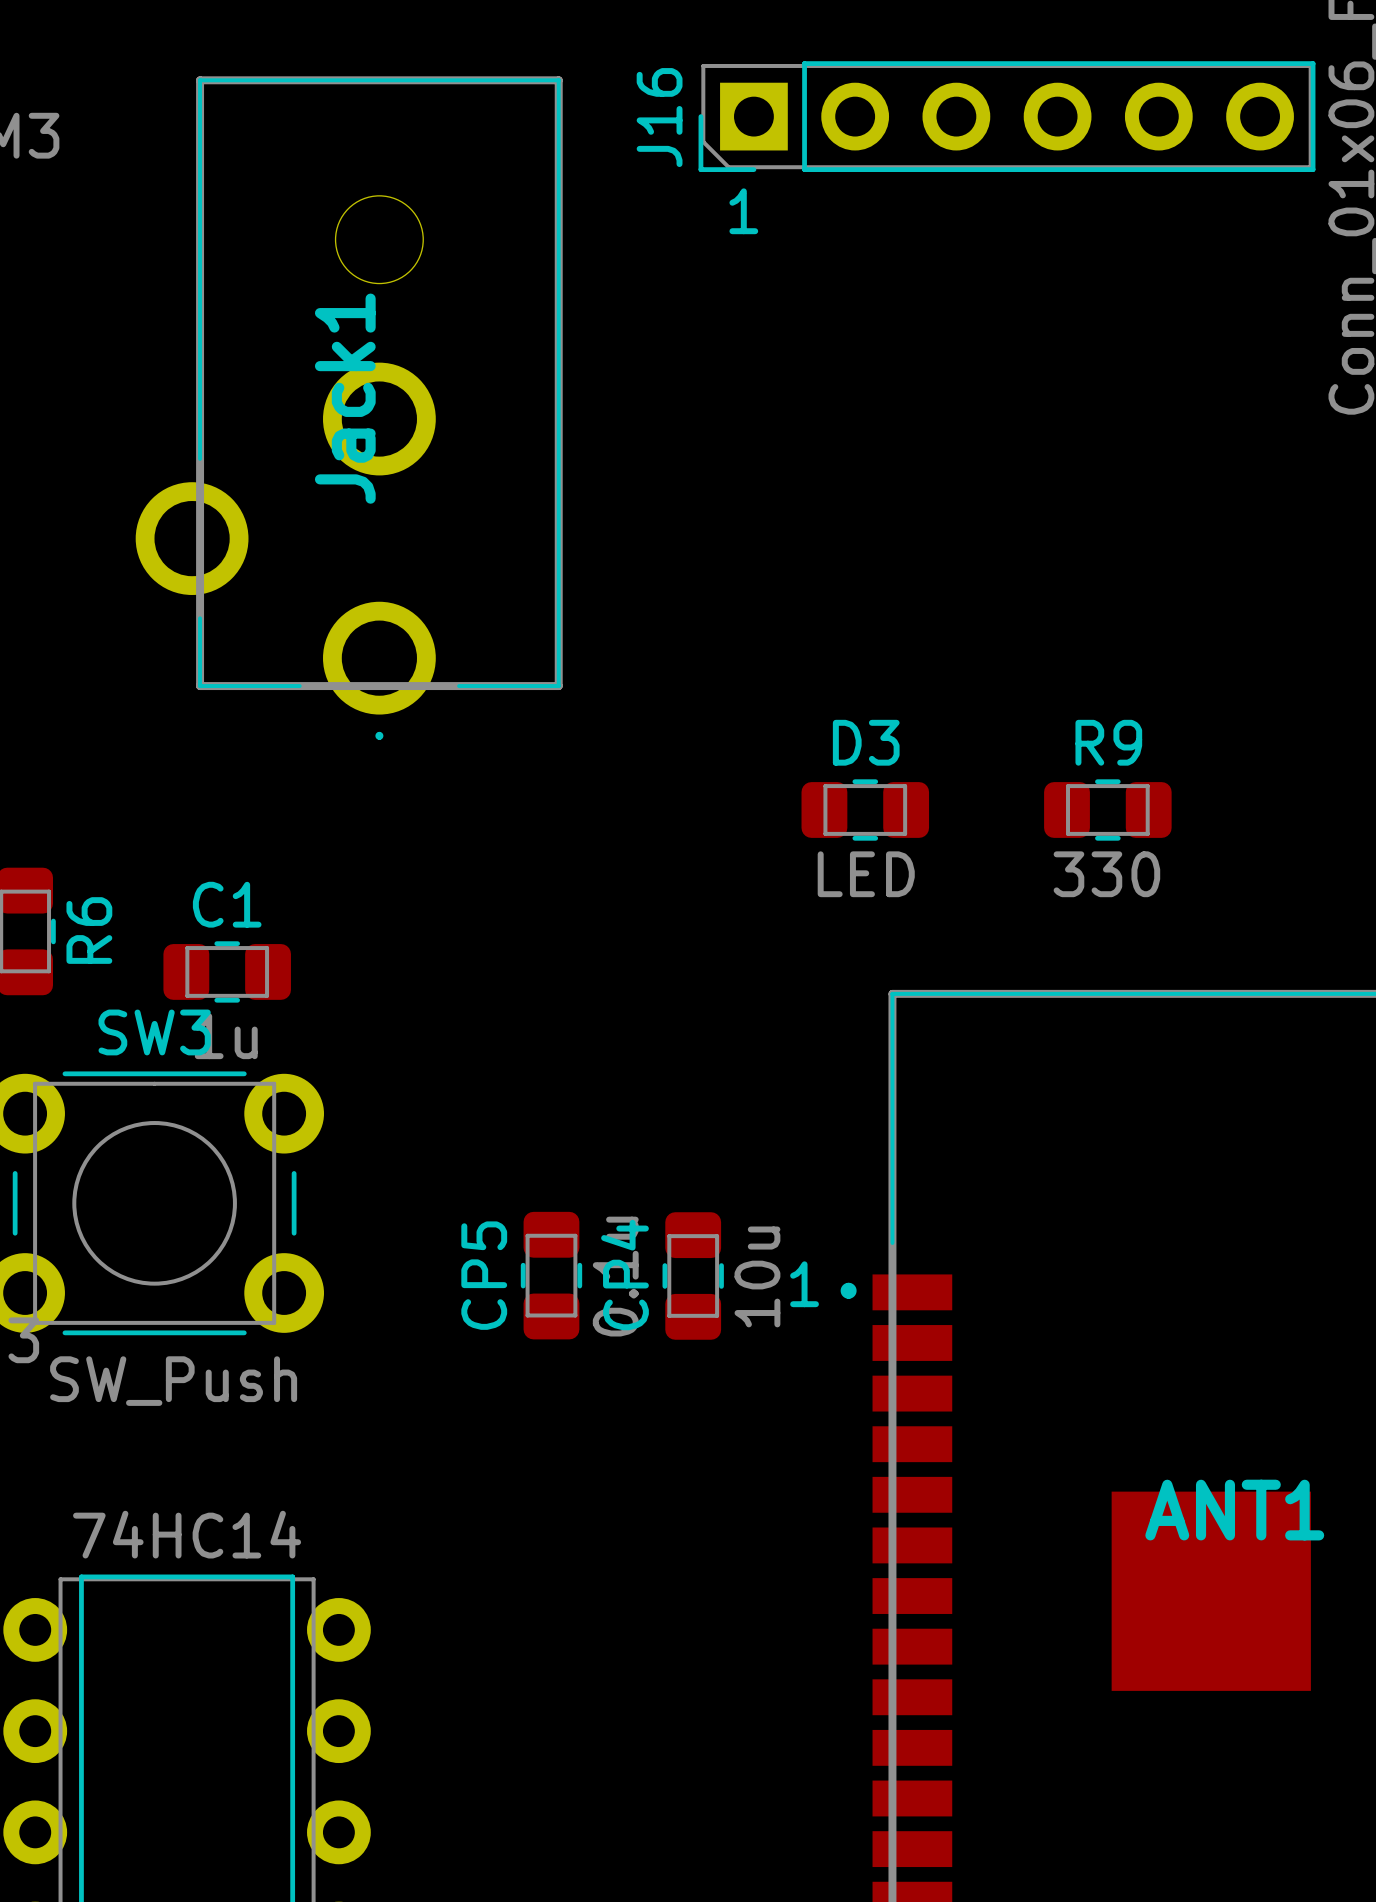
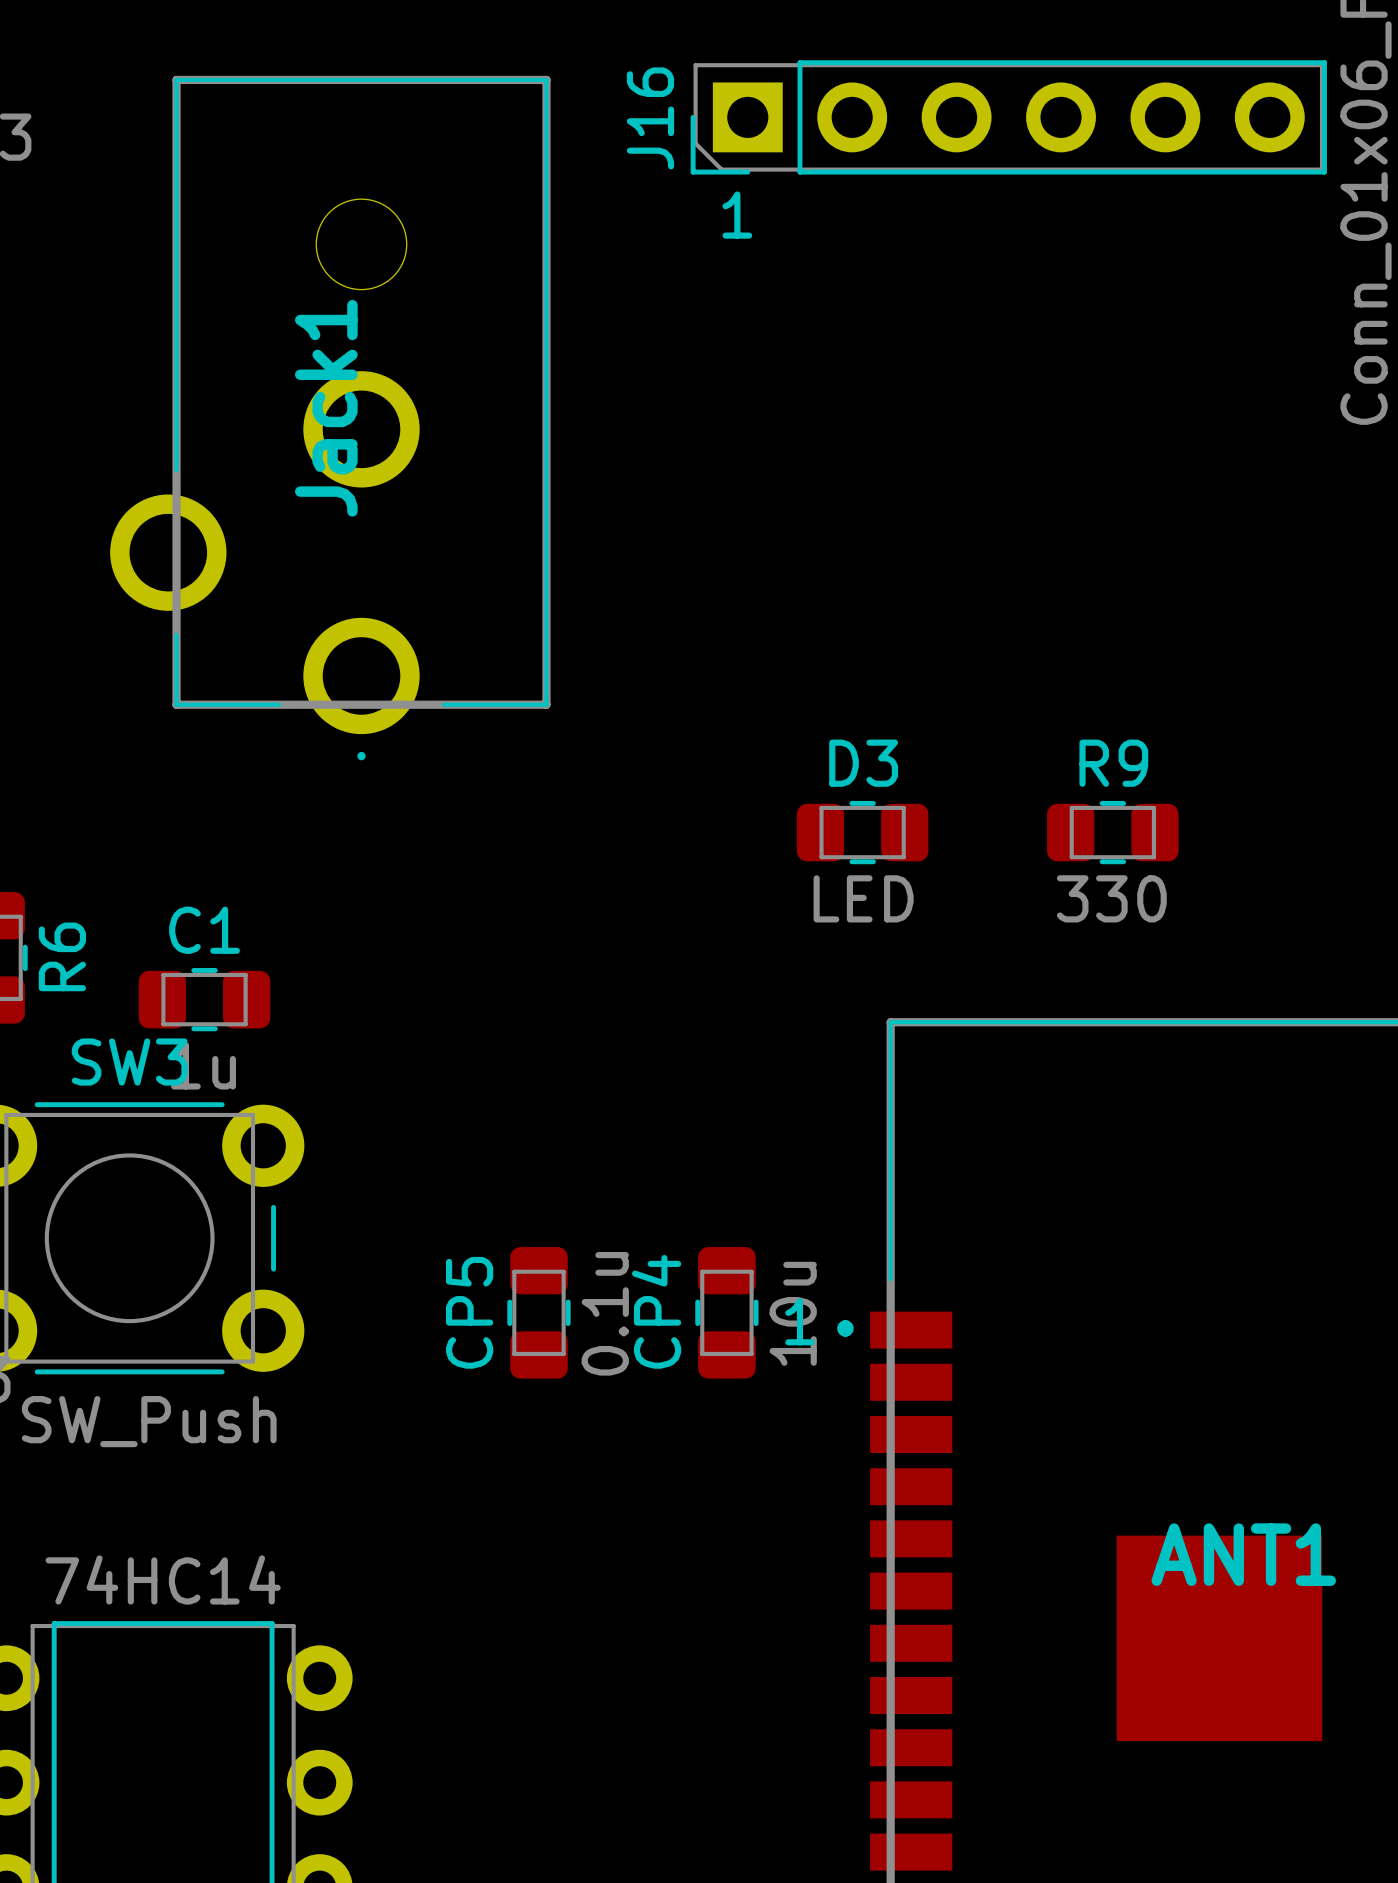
CP4 position: (693, 1275) -> (726, 1312)

